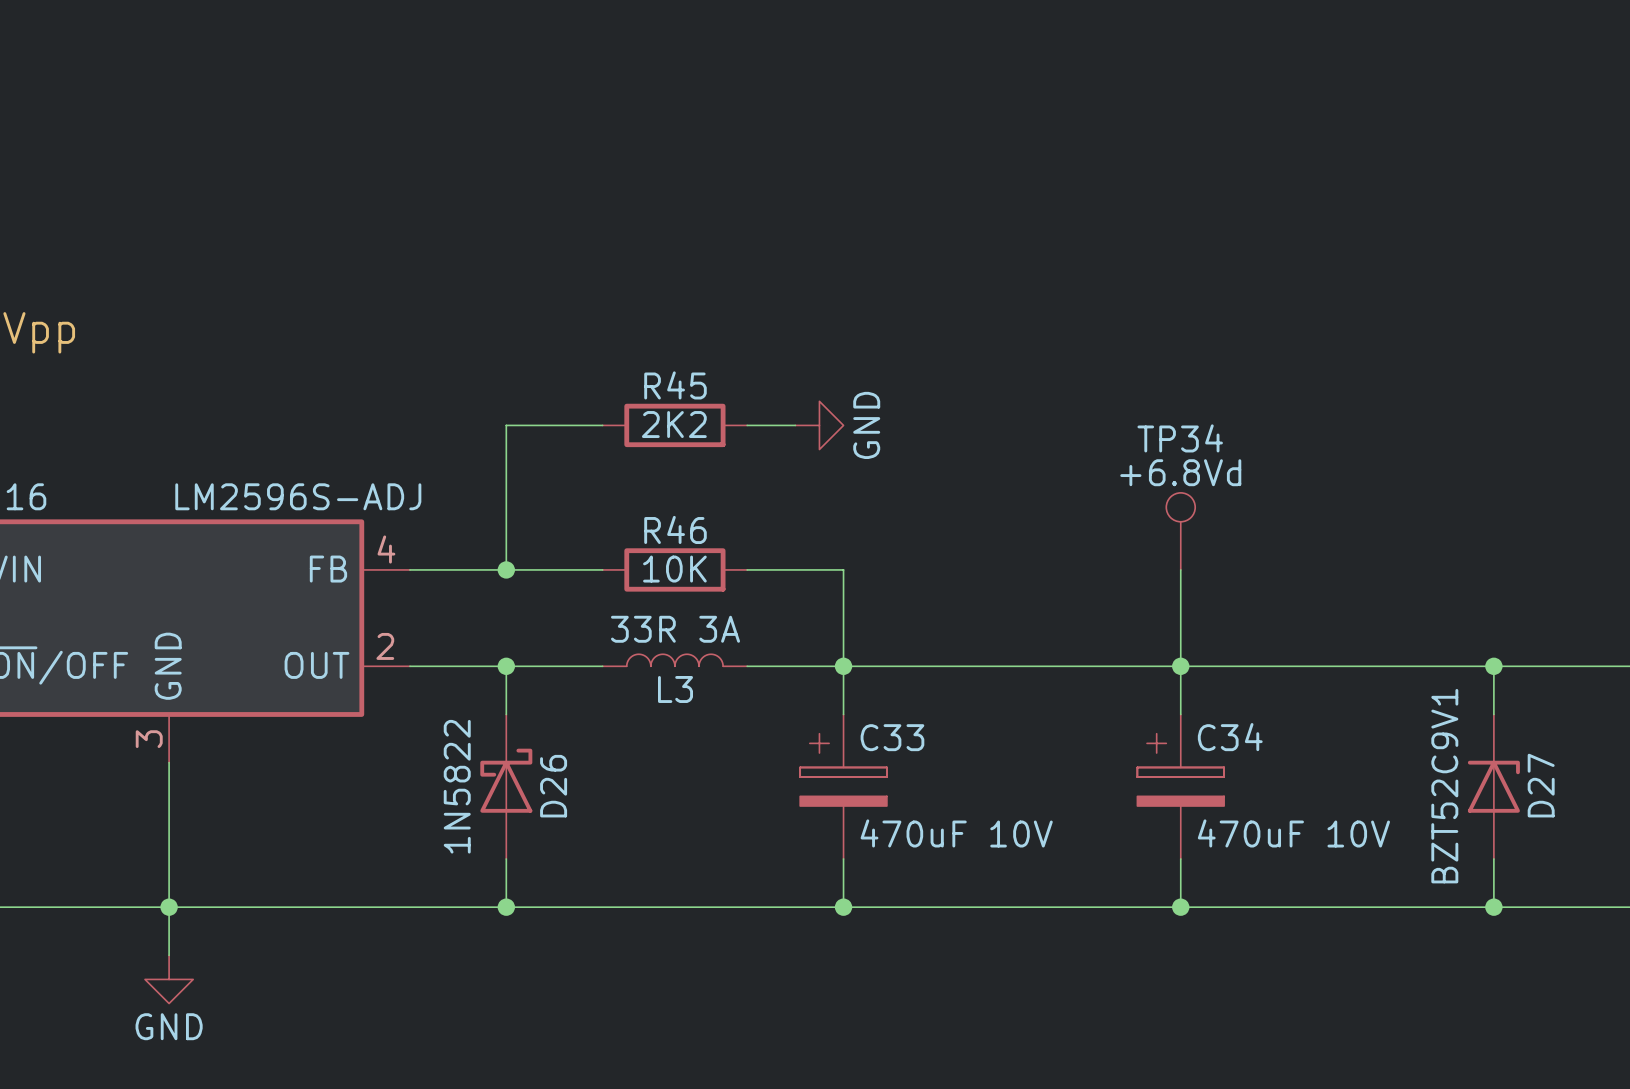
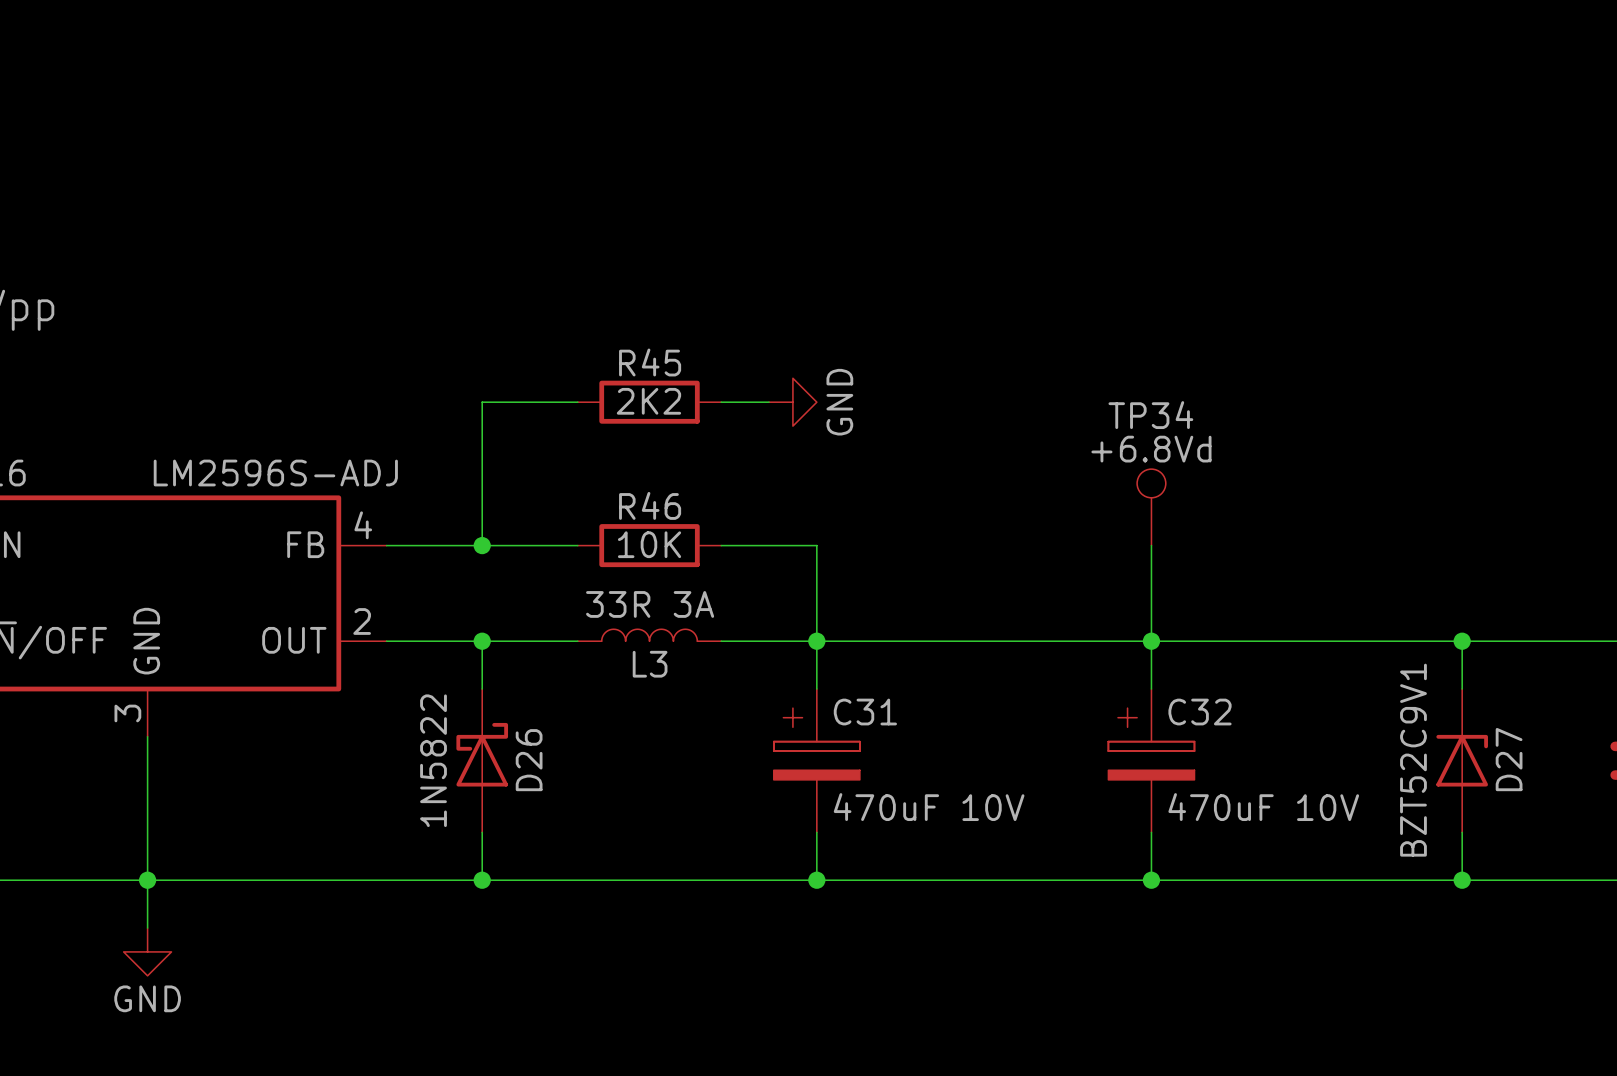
C33 name: C33 (892, 737) -> C31 (865, 712)
C34 name: C34 (1230, 737) -> C32 (1200, 712)

